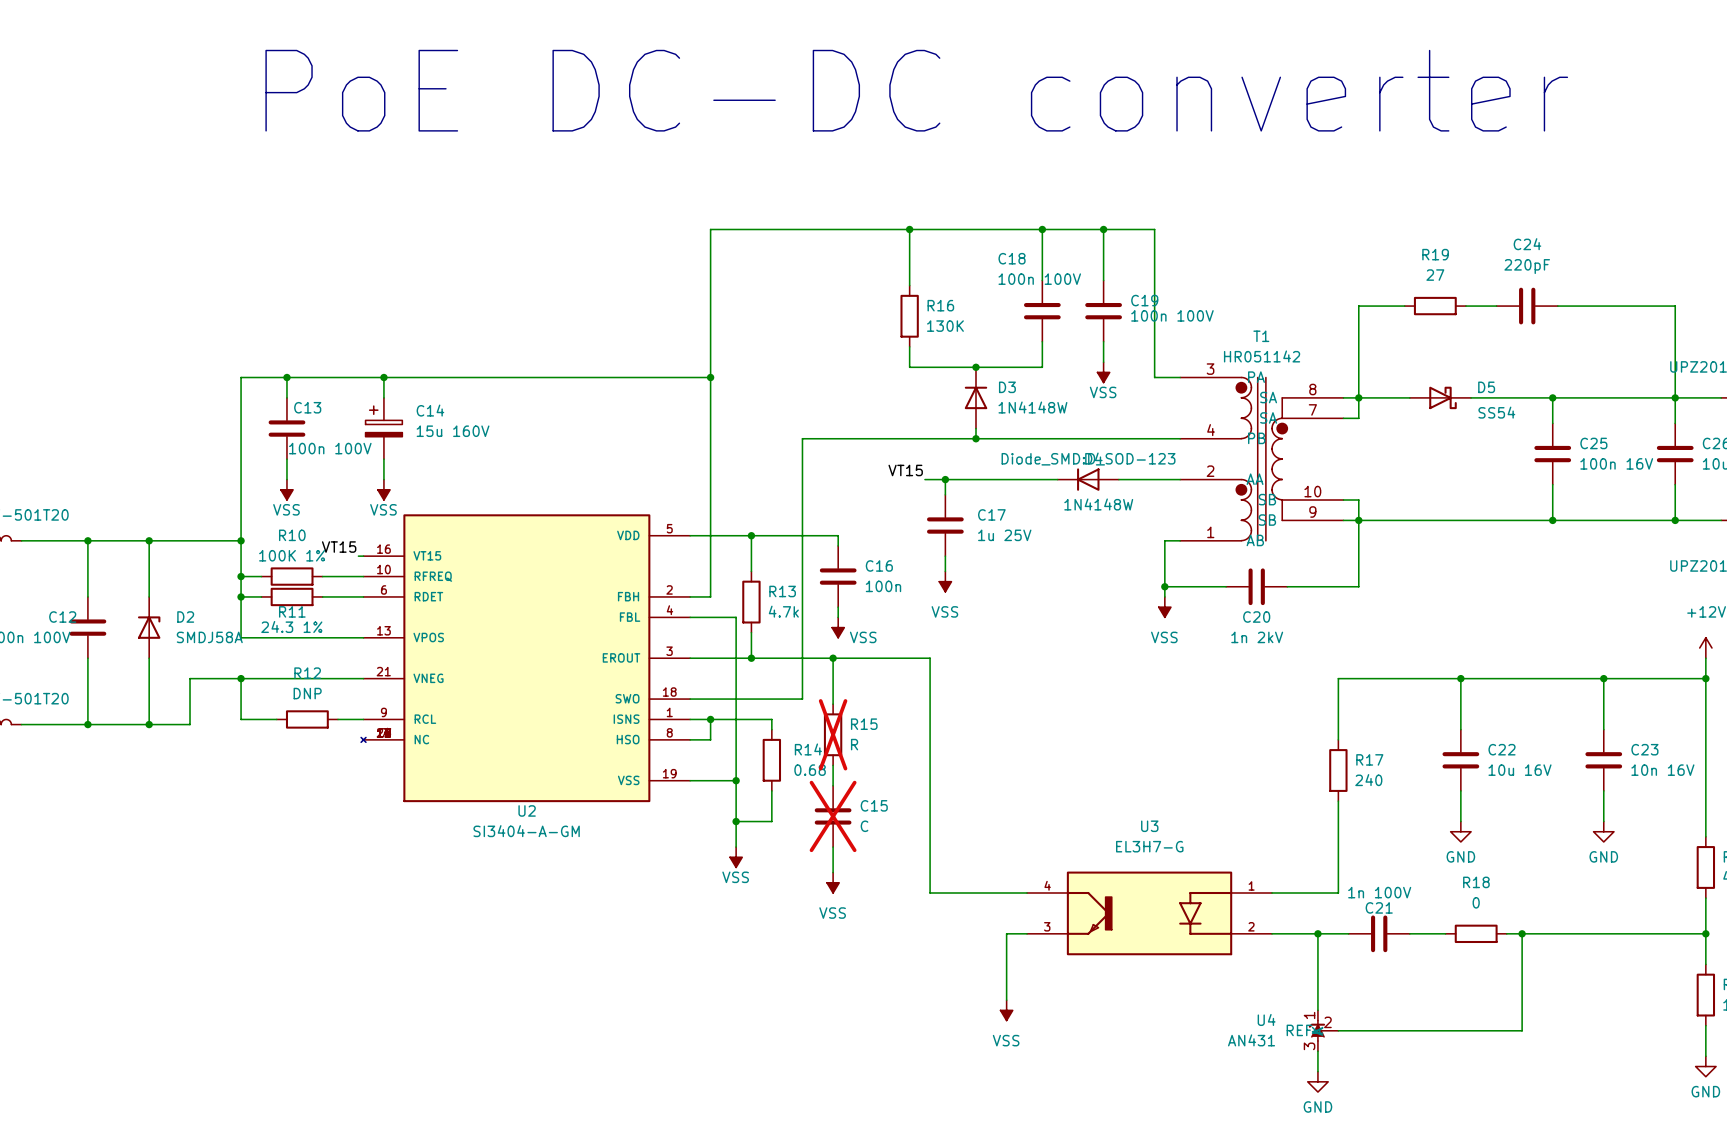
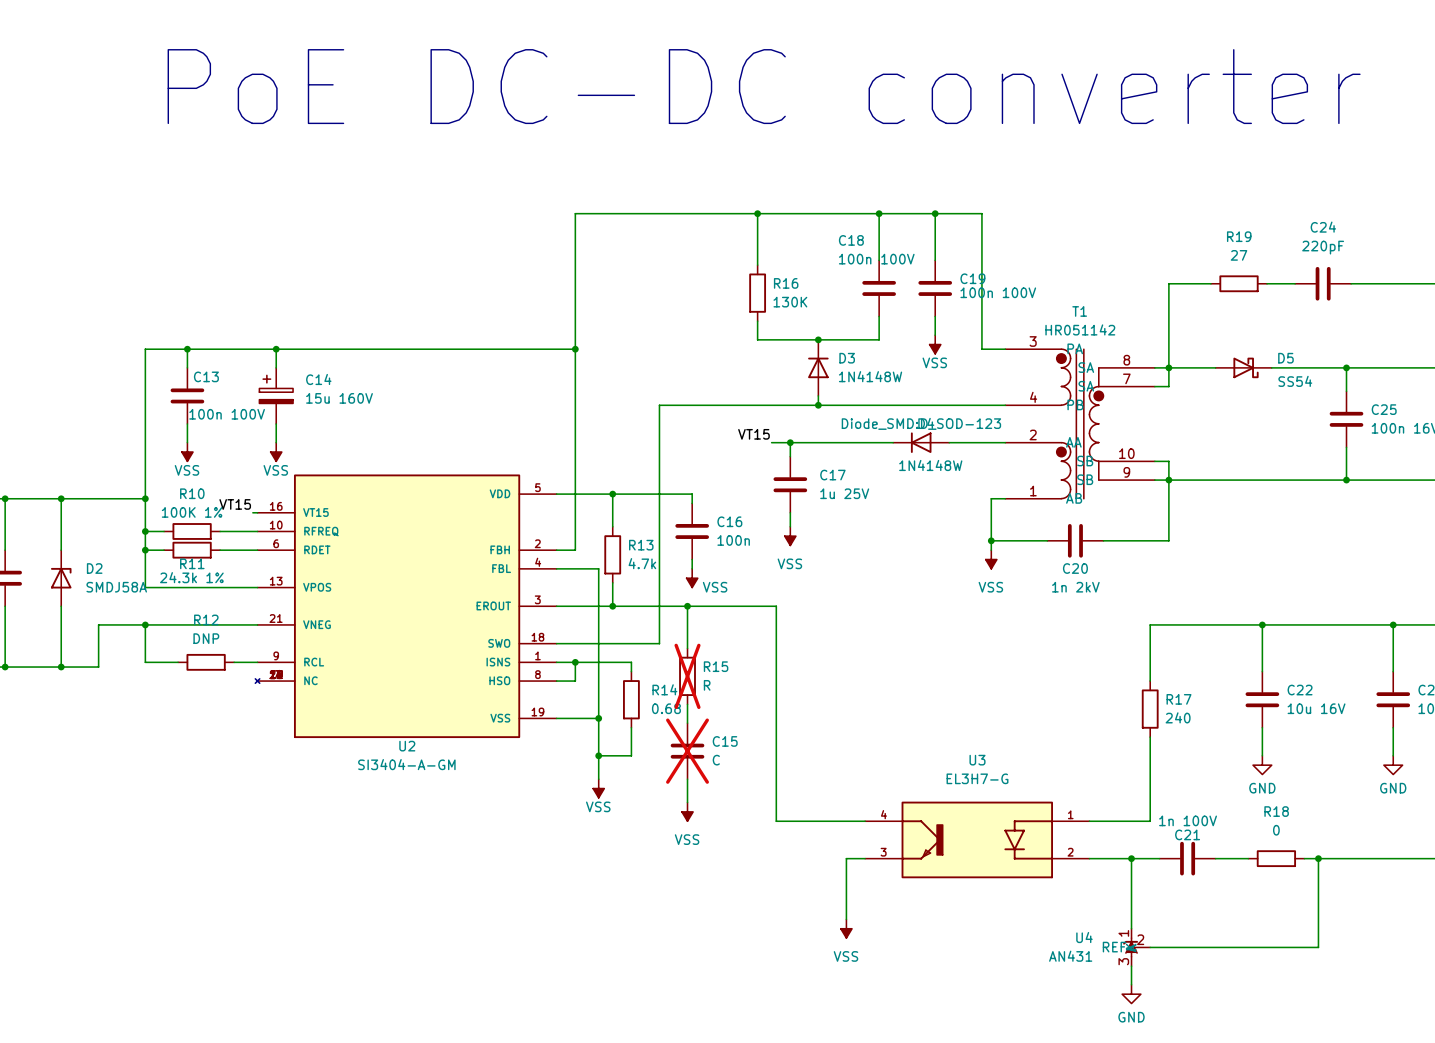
R11 value: 24.3 1% (291, 626) -> 24.3k 1% (191, 577)

